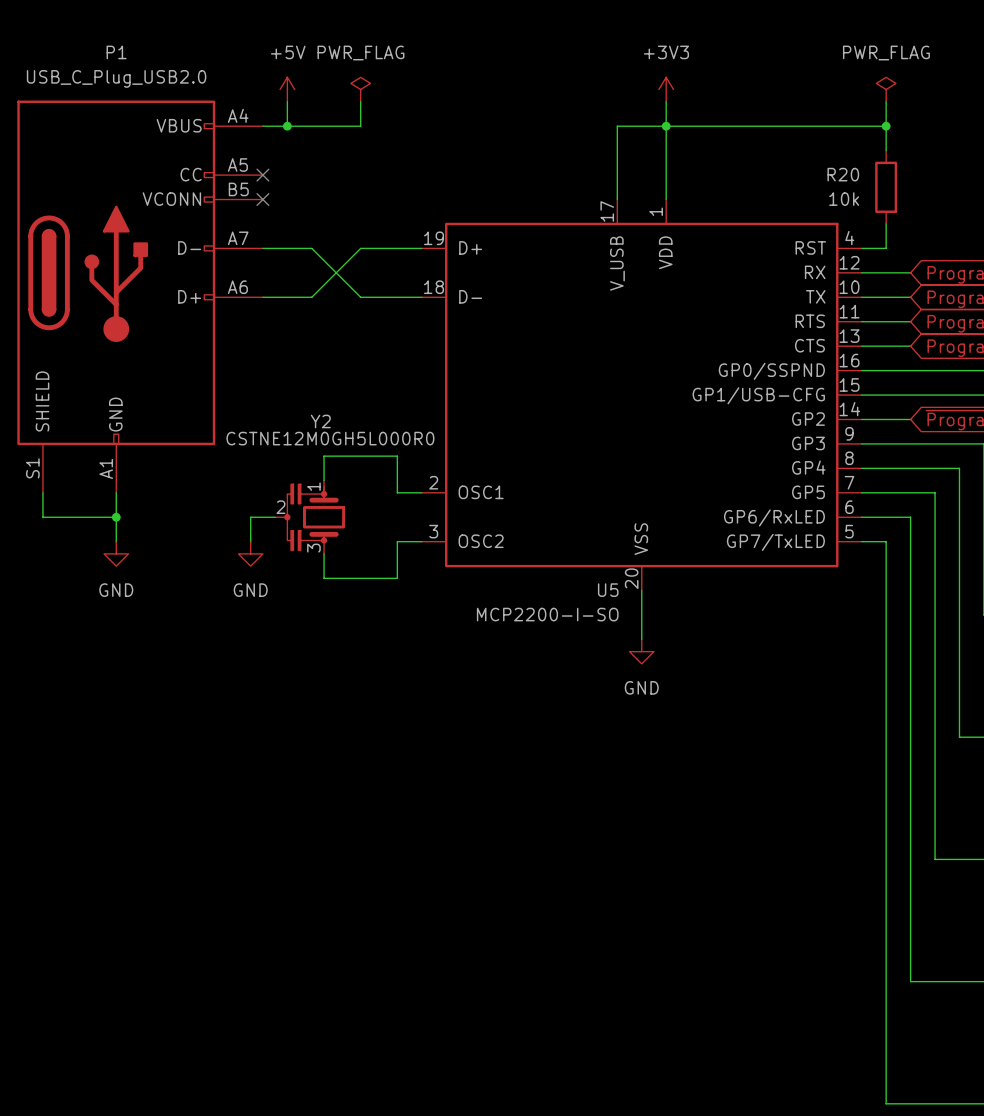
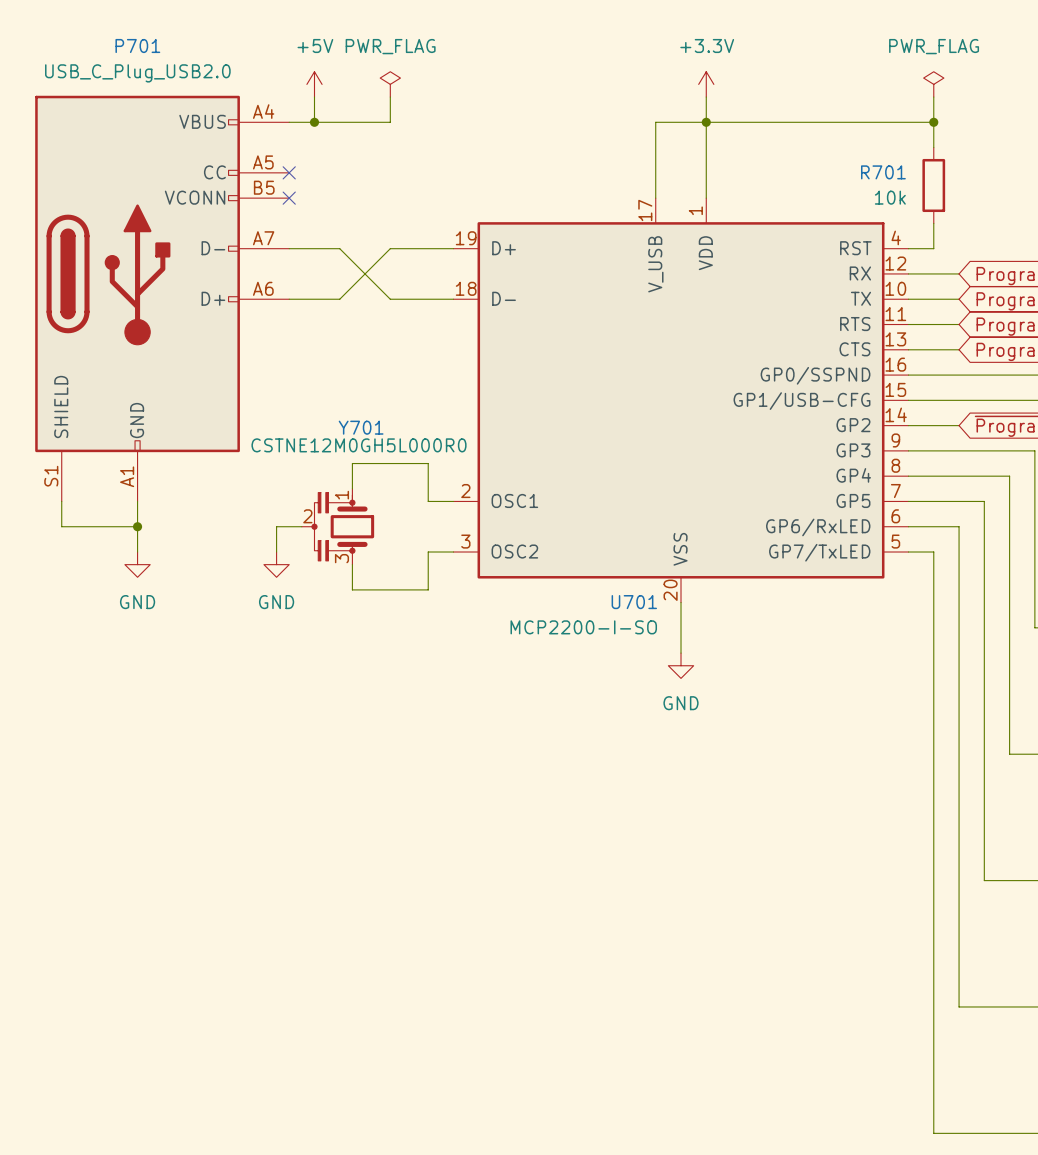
P1 name: P1 (116, 52) -> P701 (137, 46)
power symbol: +3V3 (666, 89) -> +3.3V (706, 84)
R20 name: R20 (843, 174) -> R701 (883, 172)
Y2 name: Y2 (320, 421) -> Y701 (361, 427)
U5 name: U5 (608, 590) -> U701 (634, 602)

